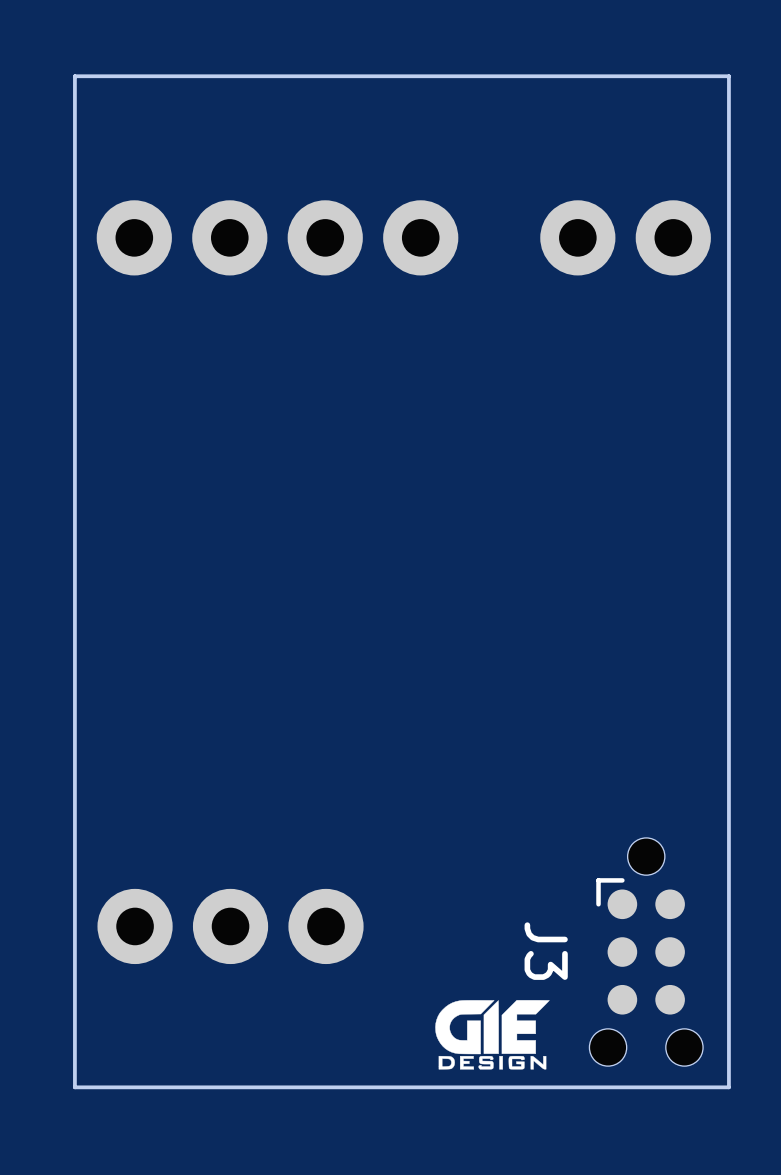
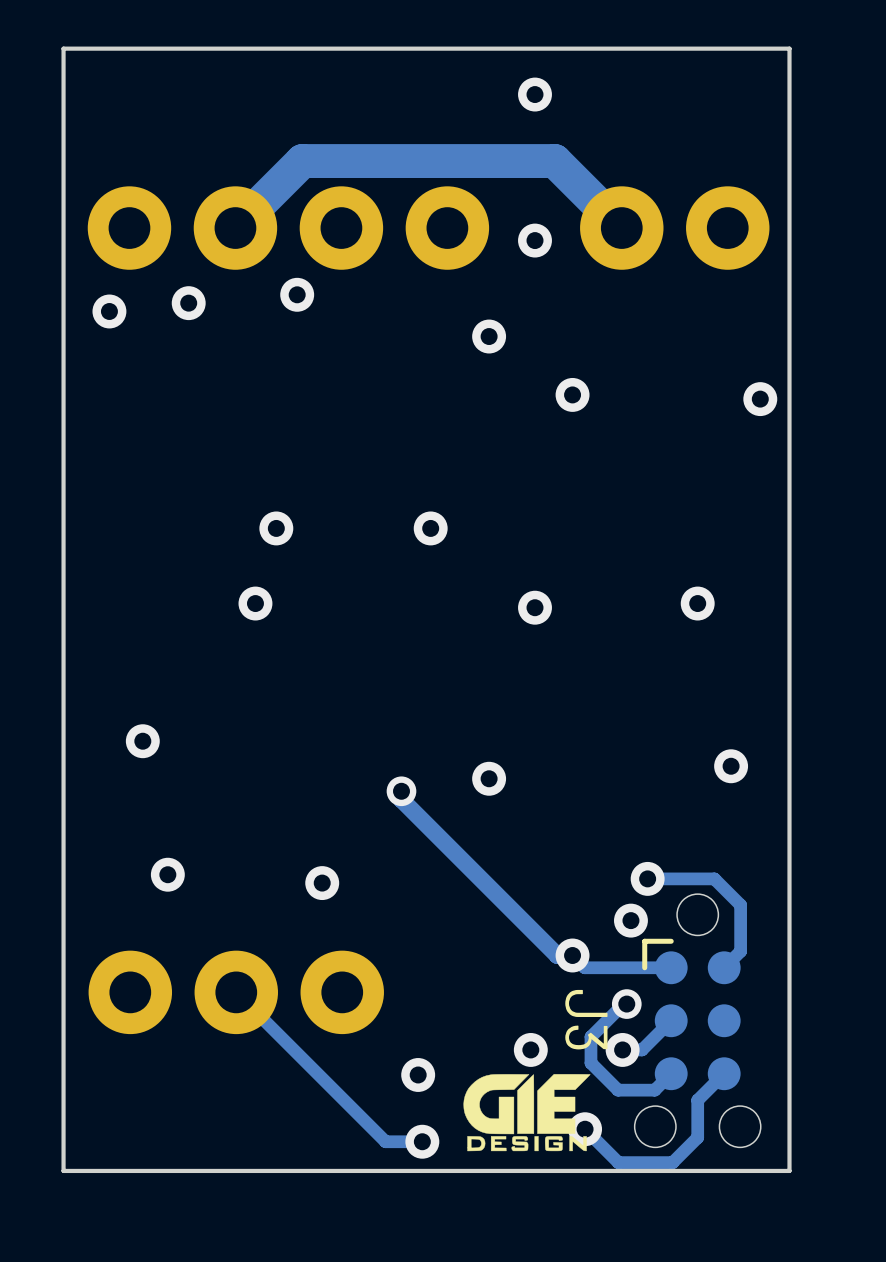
via: none -> (535, 94)
track: none -> (621, 228) (554, 161) (302, 161) (235, 228)
via: none -> (535, 240)
via: none -> (297, 294)
via: none -> (188, 303)
via: none -> (109, 311)
via: none -> (489, 336)
via: none -> (572, 394)
via: none -> (760, 399)
via: none -> (276, 528)
via: none -> (430, 528)
via: none -> (255, 603)
via: none -> (697, 603)
via: none -> (535, 607)
via: none -> (142, 741)
via: none -> (731, 766)
via: none -> (489, 778)
track: none -> (401, 791) (401, 799) (557, 955) (572, 955) (584, 967) (671, 967)
via: none -> (401, 791)
via: none -> (167, 874)
track: none -> (647, 878) (714, 878) (740, 905) (740, 951) (724, 967)
via: none -> (647, 878)
via: none -> (322, 883)
via: none -> (630, 920)
via: none -> (572, 955)
track: none -> (236, 992) (385, 1141) (422, 1141)
track: none -> (626, 1004) (623, 1004) (590, 1036) (590, 1063) (618, 1090) (654, 1090) (671, 1073)
via: none -> (626, 1004)
track: none -> (671, 1020) (642, 1049) (622, 1049)
via: none -> (530, 1049)
via: none -> (622, 1049)
track: none -> (724, 1073) (697, 1100) (697, 1137) (672, 1162) (618, 1162) (585, 1129)
via: none -> (418, 1074)
via: none -> (585, 1129)
via: none -> (422, 1141)

